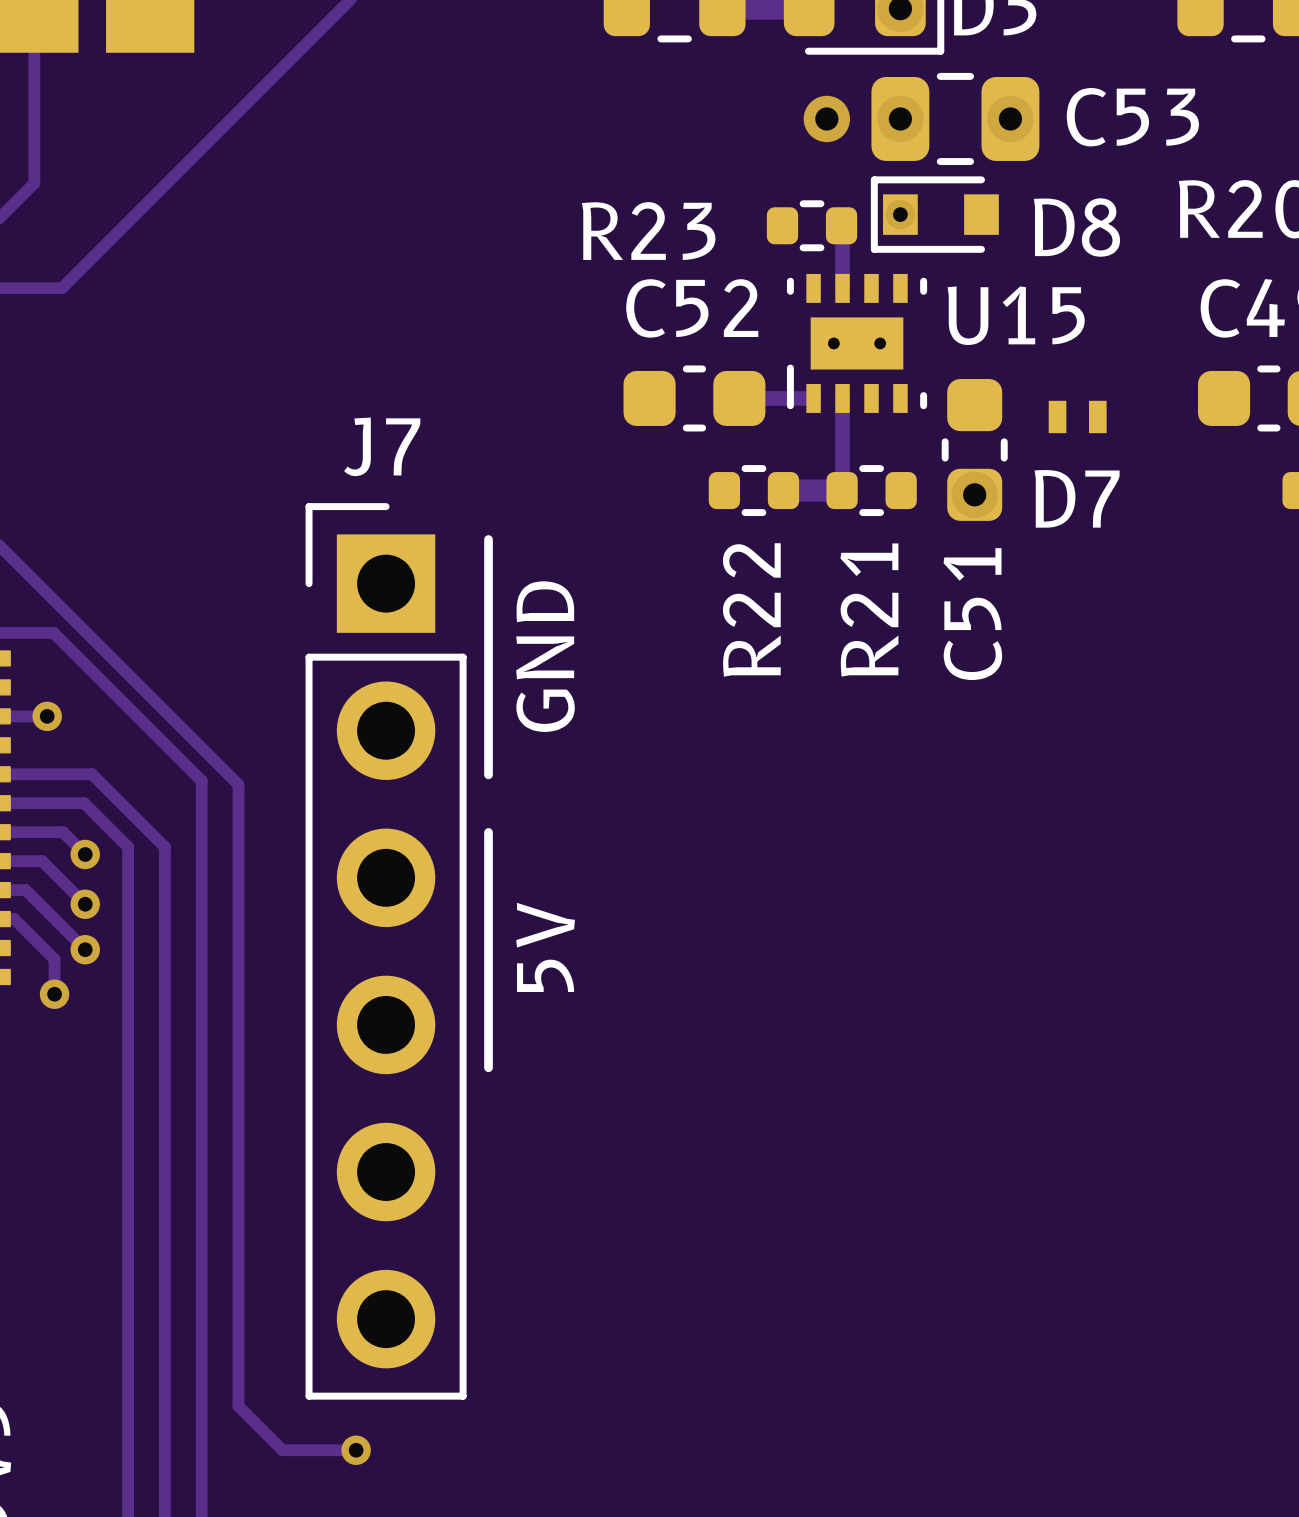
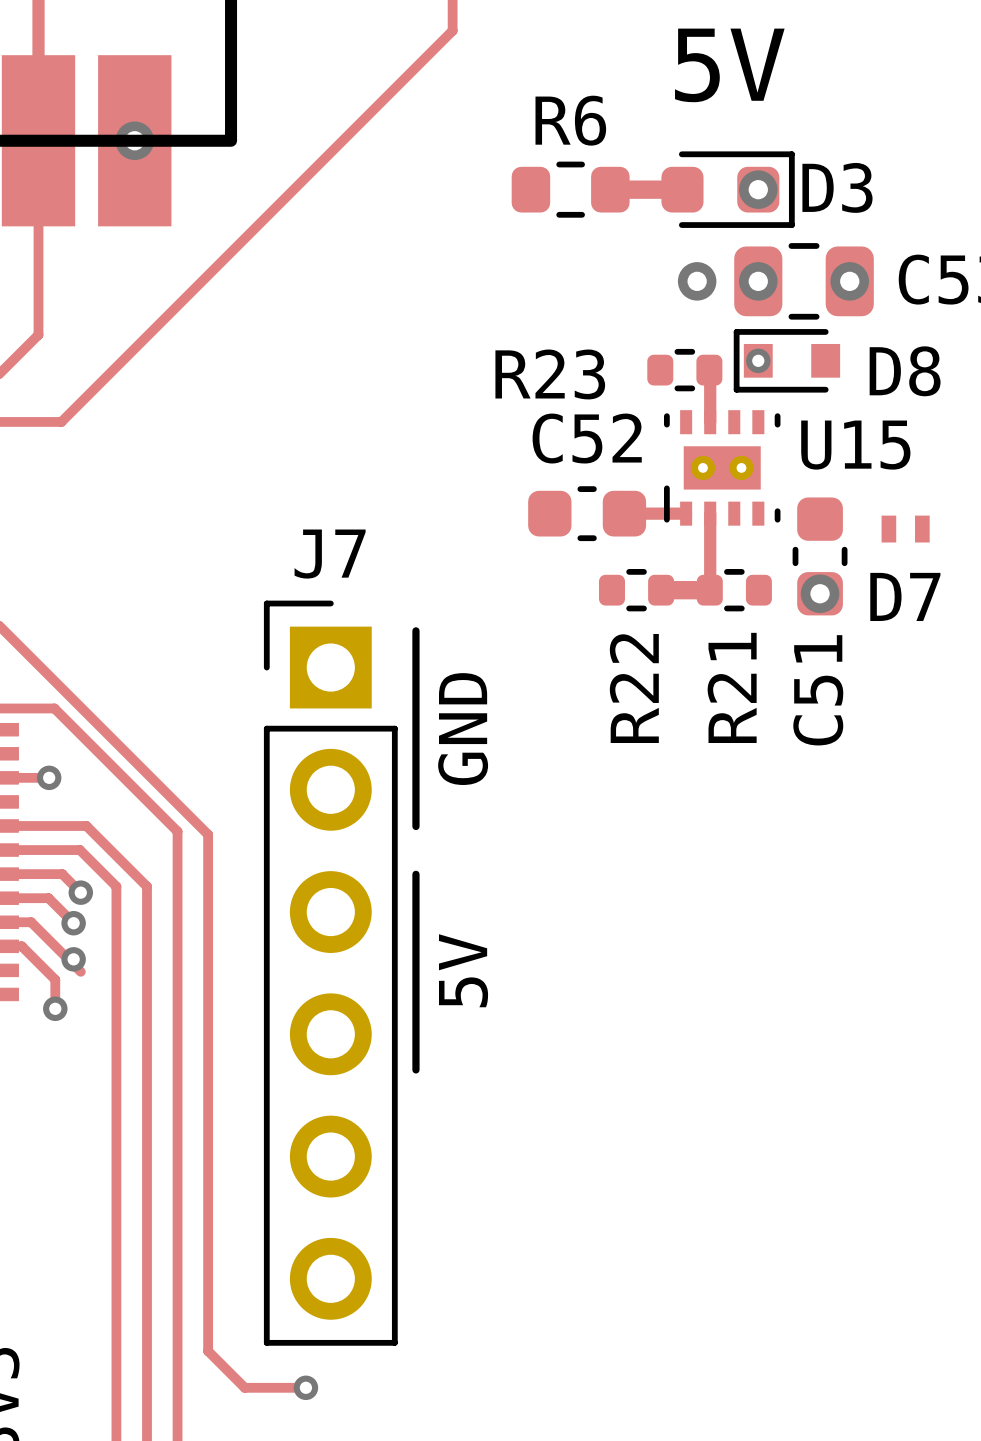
track: (42, 861) (85, 904) -> (44, 898) (48, 898) (73, 923)
via position: (85, 904) -> (73, 923)
via position: (85, 949) -> (73, 959)

